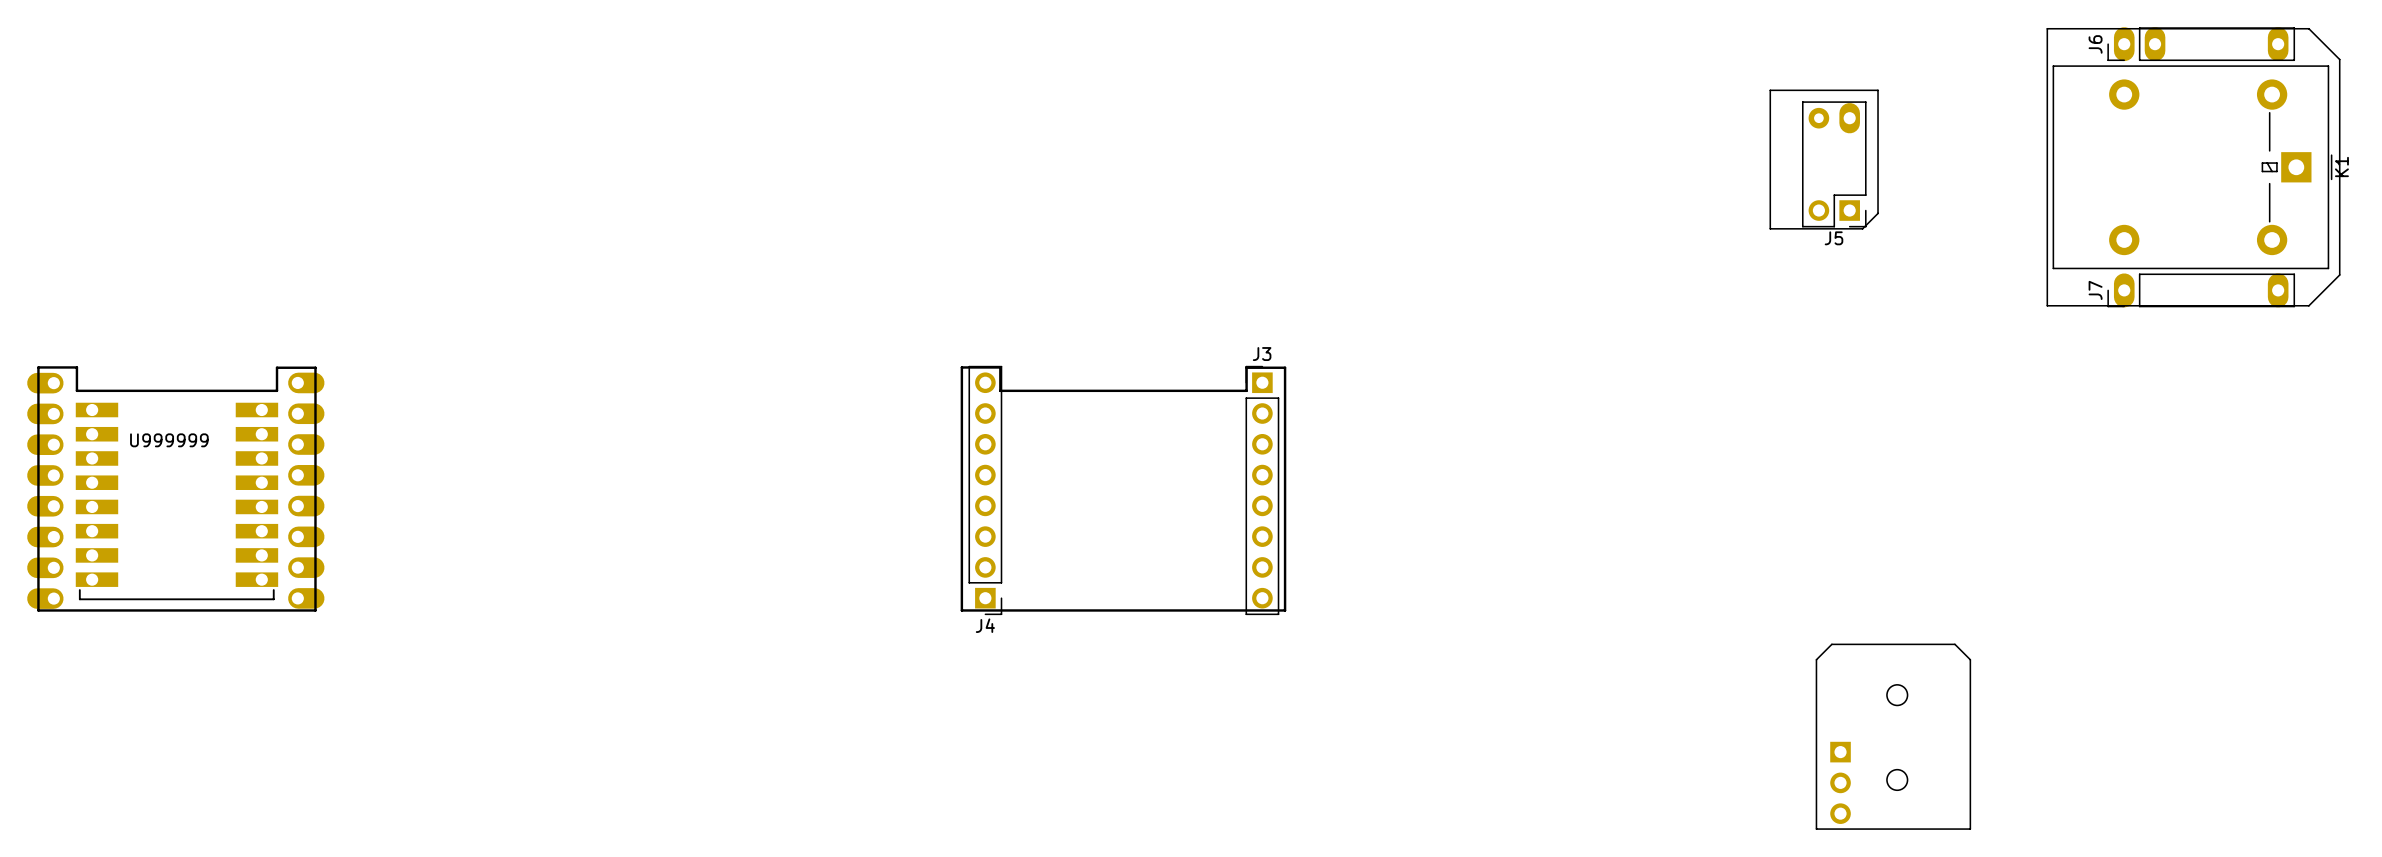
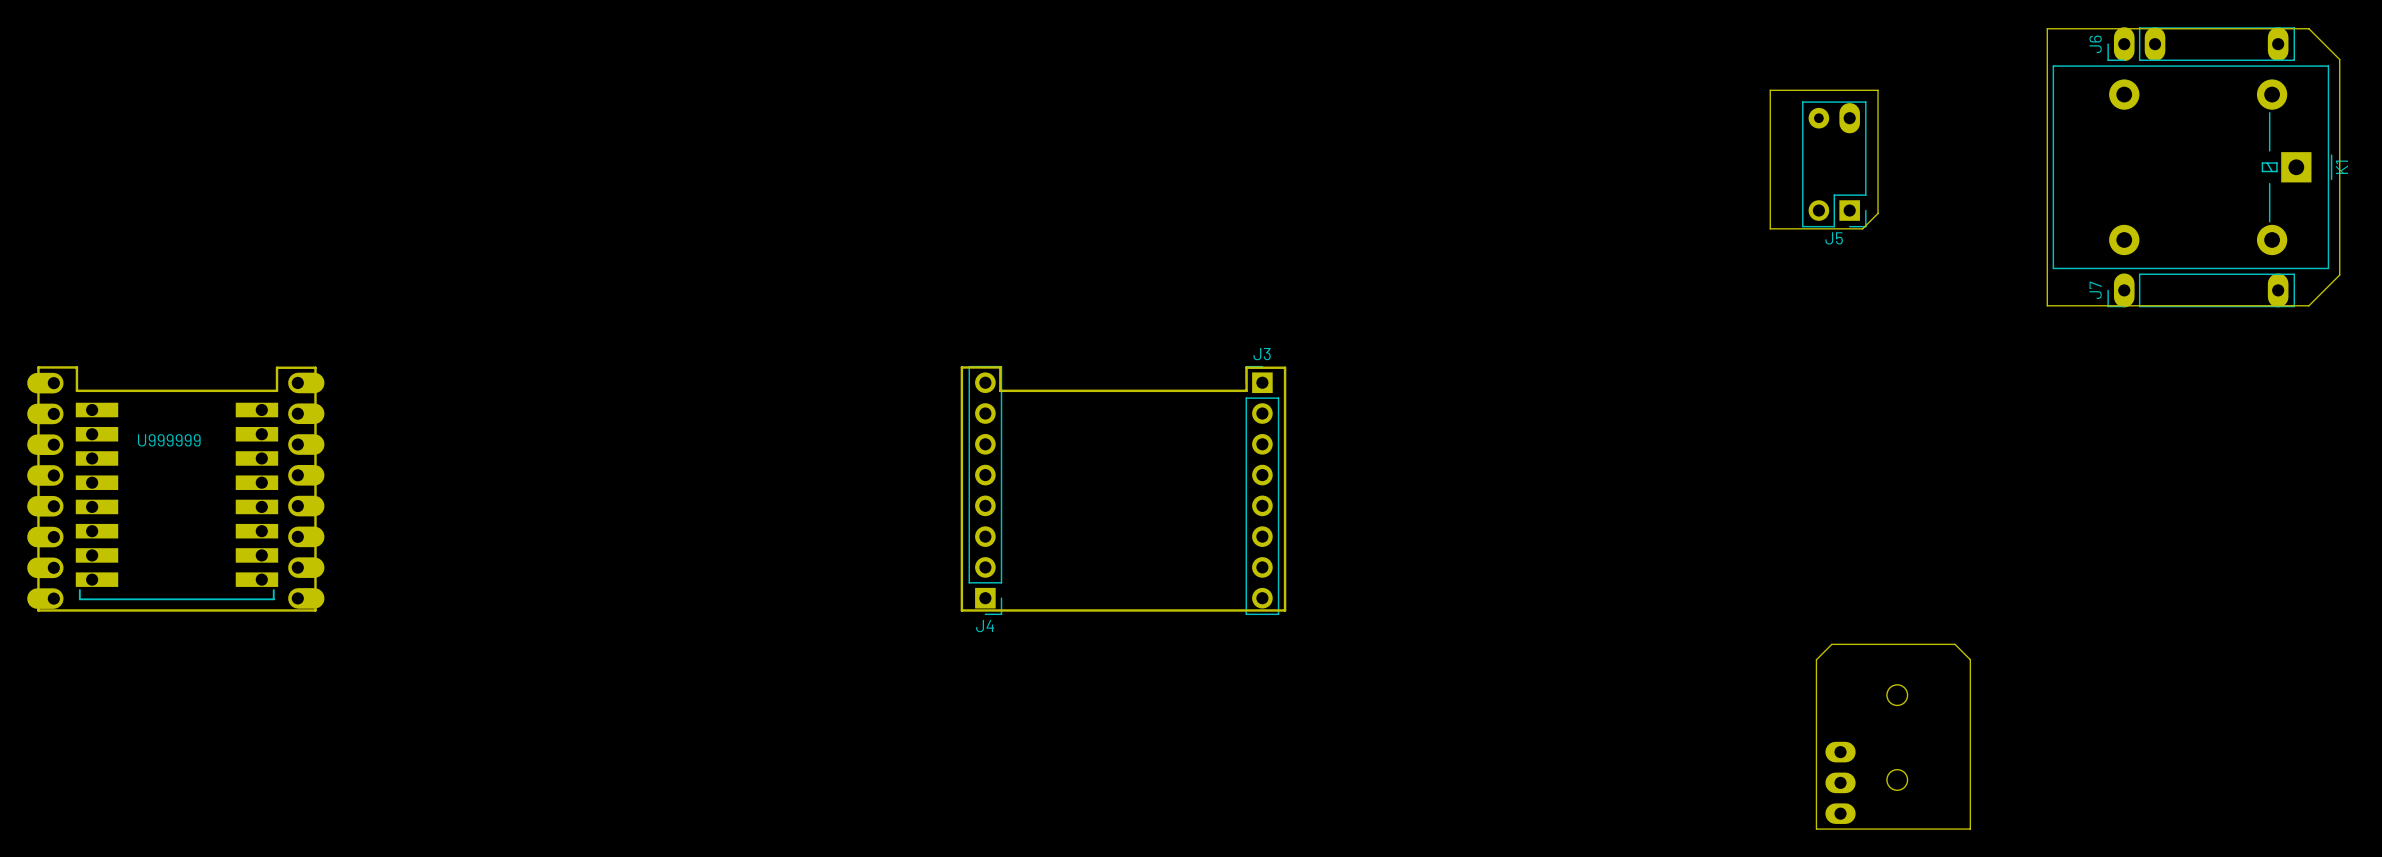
part footprint: [1830, 741, 1851, 824] -> [1825, 741, 1856, 824]

